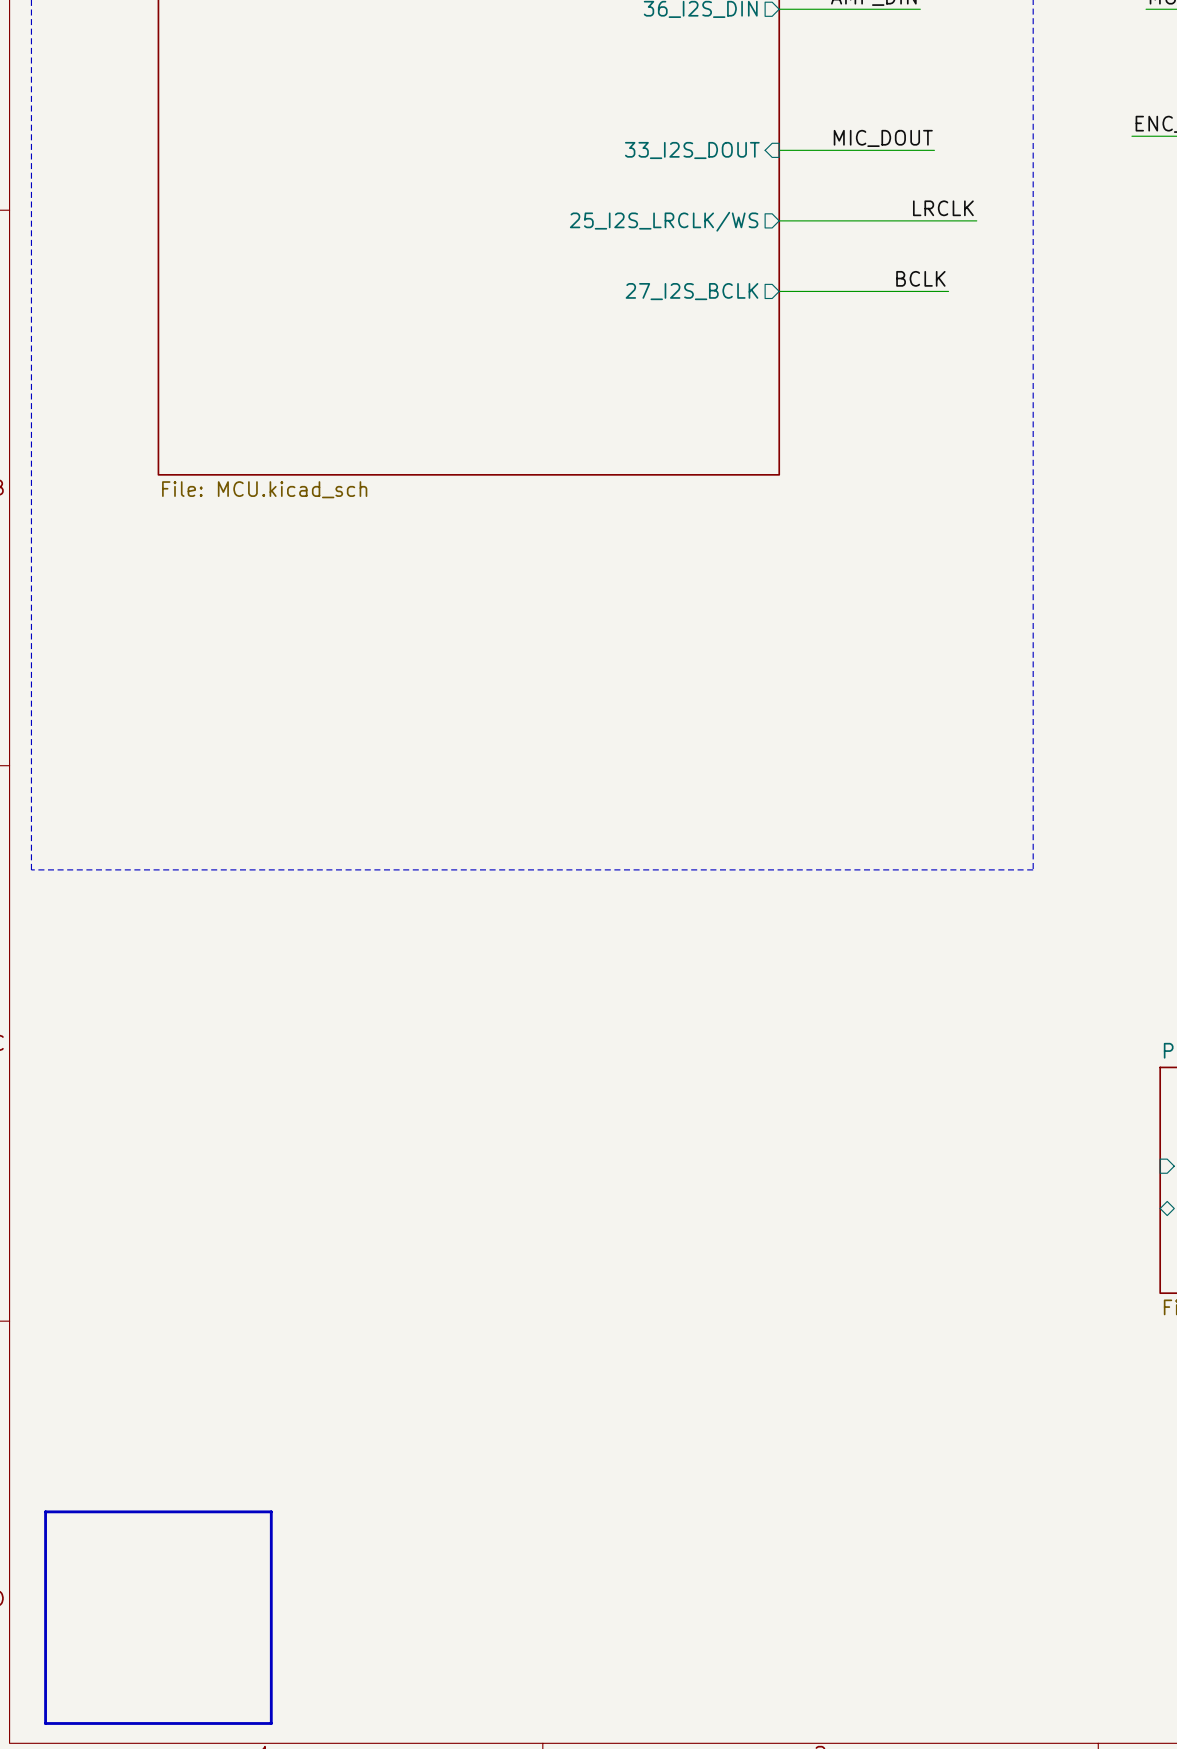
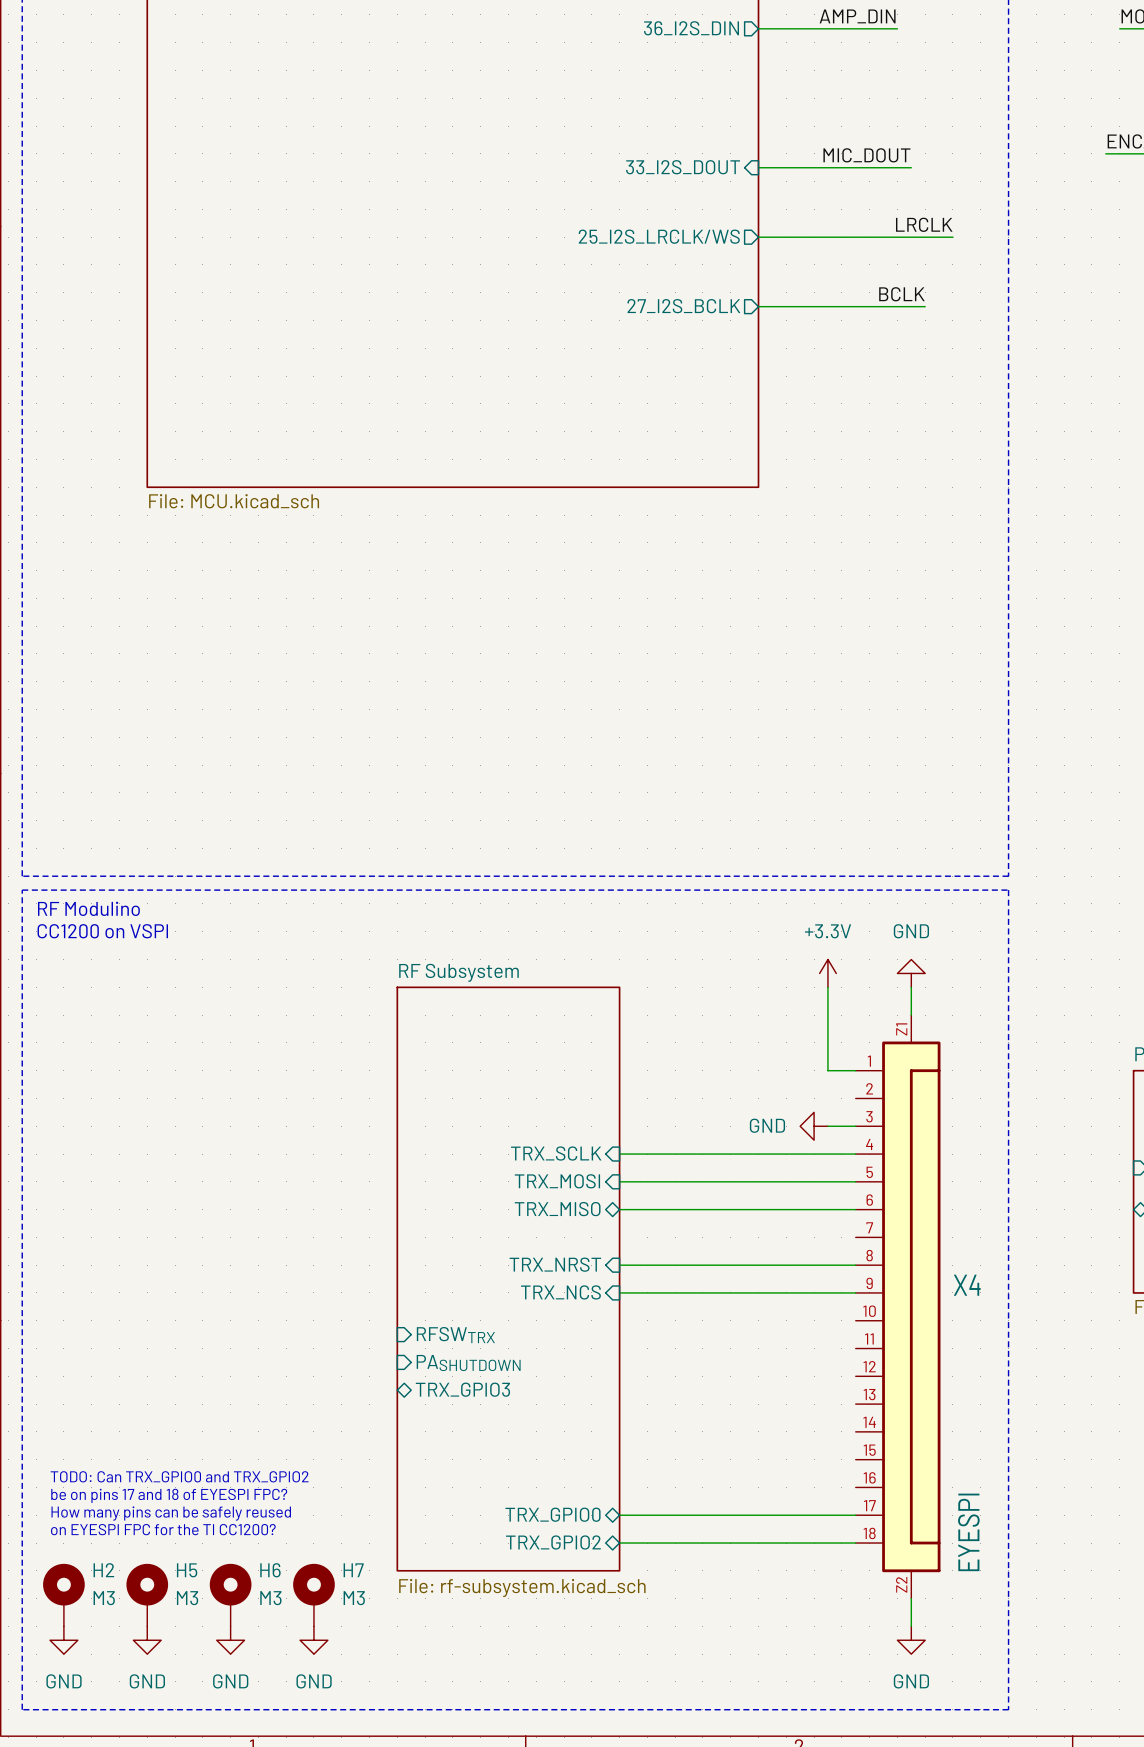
line: none -> (22, 890) (1008, 890) (1008, 1709) (22, 1709) (22, 890)
text: none -> RF Modulino (88, 908)
text: none -> CC1200 on VSPI (102, 931)
power symbol: none -> +3.3V (827, 973)
power symbol: none -> GND (911, 973)
wire: none -> (827, 987) (827, 1070) (855, 1070)
wire: none -> (911, 987) (911, 1015)
power symbol: none -> GND (814, 1126)
wire: none -> (827, 1126) (855, 1126)
sheet pin: none -> TRX_SCLK (556, 1153)
wire: none -> (619, 1154) (855, 1154)
sheet pin: none -> TRX_MOSI (557, 1181)
wire: none -> (619, 1181) (855, 1181)
sheet pin: none -> TRX_MISO (557, 1209)
wire: none -> (619, 1209) (855, 1209)
wire: none -> (619, 1265) (855, 1265)
sheet pin: none -> TRX_NRST (555, 1264)
sheet RF Subsystem: none -> File: rf-subsystem.kicad_sch (508, 1279)
sheet pin: none -> TRX_NCS (560, 1292)
wire: none -> (619, 1292) (855, 1292)
X4: none -> EYESPI (898, 1306)
sheet pin: none -> RFSWTRX (455, 1335)
sheet pin: none -> PASHUTDOWN (468, 1362)
sheet pin: none -> TRX_GPIO3 (462, 1389)
text: none -> TODO: Can TRX_GPIO0 and TRX_GPIO2 (179, 1476)
text: none -> be on pins 17 and 18 of EYESPI FPC? (169, 1495)
line: (45, 1511) (271, 1511) (271, 1723) (45, 1723) (45, 1511) -> none
text: none -> How many pins can be safely reused (171, 1513)
wire: none -> (619, 1515) (855, 1515)
sheet pin: none -> TRX_GPIO0 (552, 1514)
text: none -> on EYESPI FPC for the TI CC1200? (163, 1529)
sheet pin: none -> TRX_GPIO2 (553, 1542)
wire: none -> (619, 1543) (855, 1543)
H2: none -> M3 (63, 1595)
H5: none -> M3 (147, 1595)
H6: none -> M3 (230, 1595)
H7: none -> M3 (313, 1595)
wire: none -> (911, 1598) (911, 1626)
power symbol: none -> GND (63, 1640)
power symbol: none -> GND (147, 1640)
power symbol: none -> GND (230, 1640)
power symbol: none -> GND (313, 1640)
power symbol: none -> GND (911, 1640)

